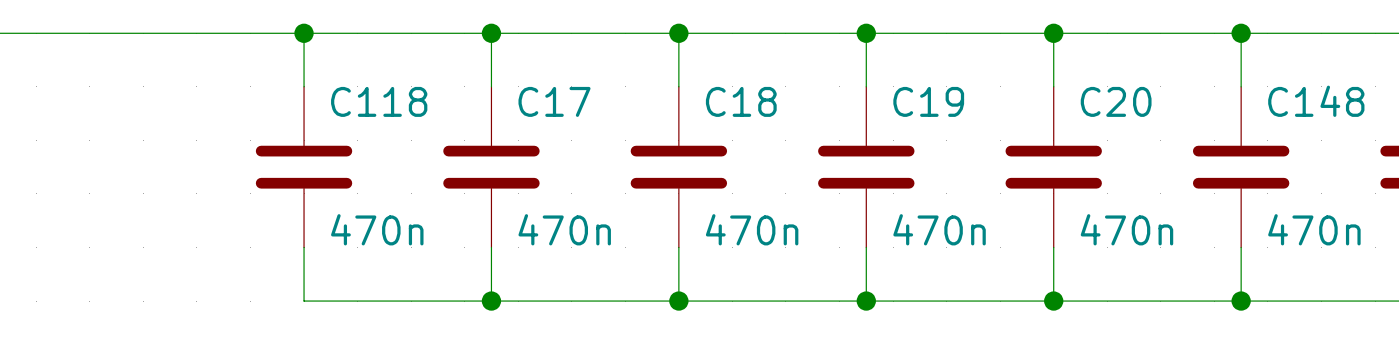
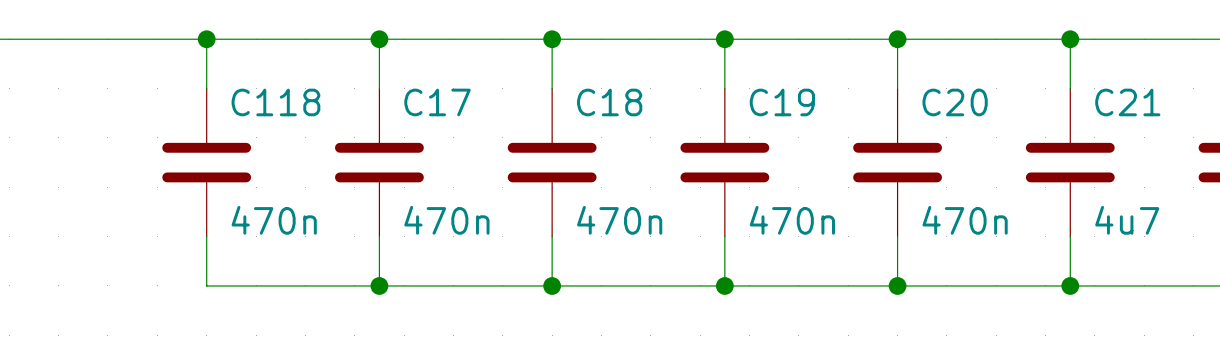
C148 name: C148 (1316, 101) -> C21 (1127, 102)
C148 value: 470n (1314, 229) -> 4u7 (1127, 220)

